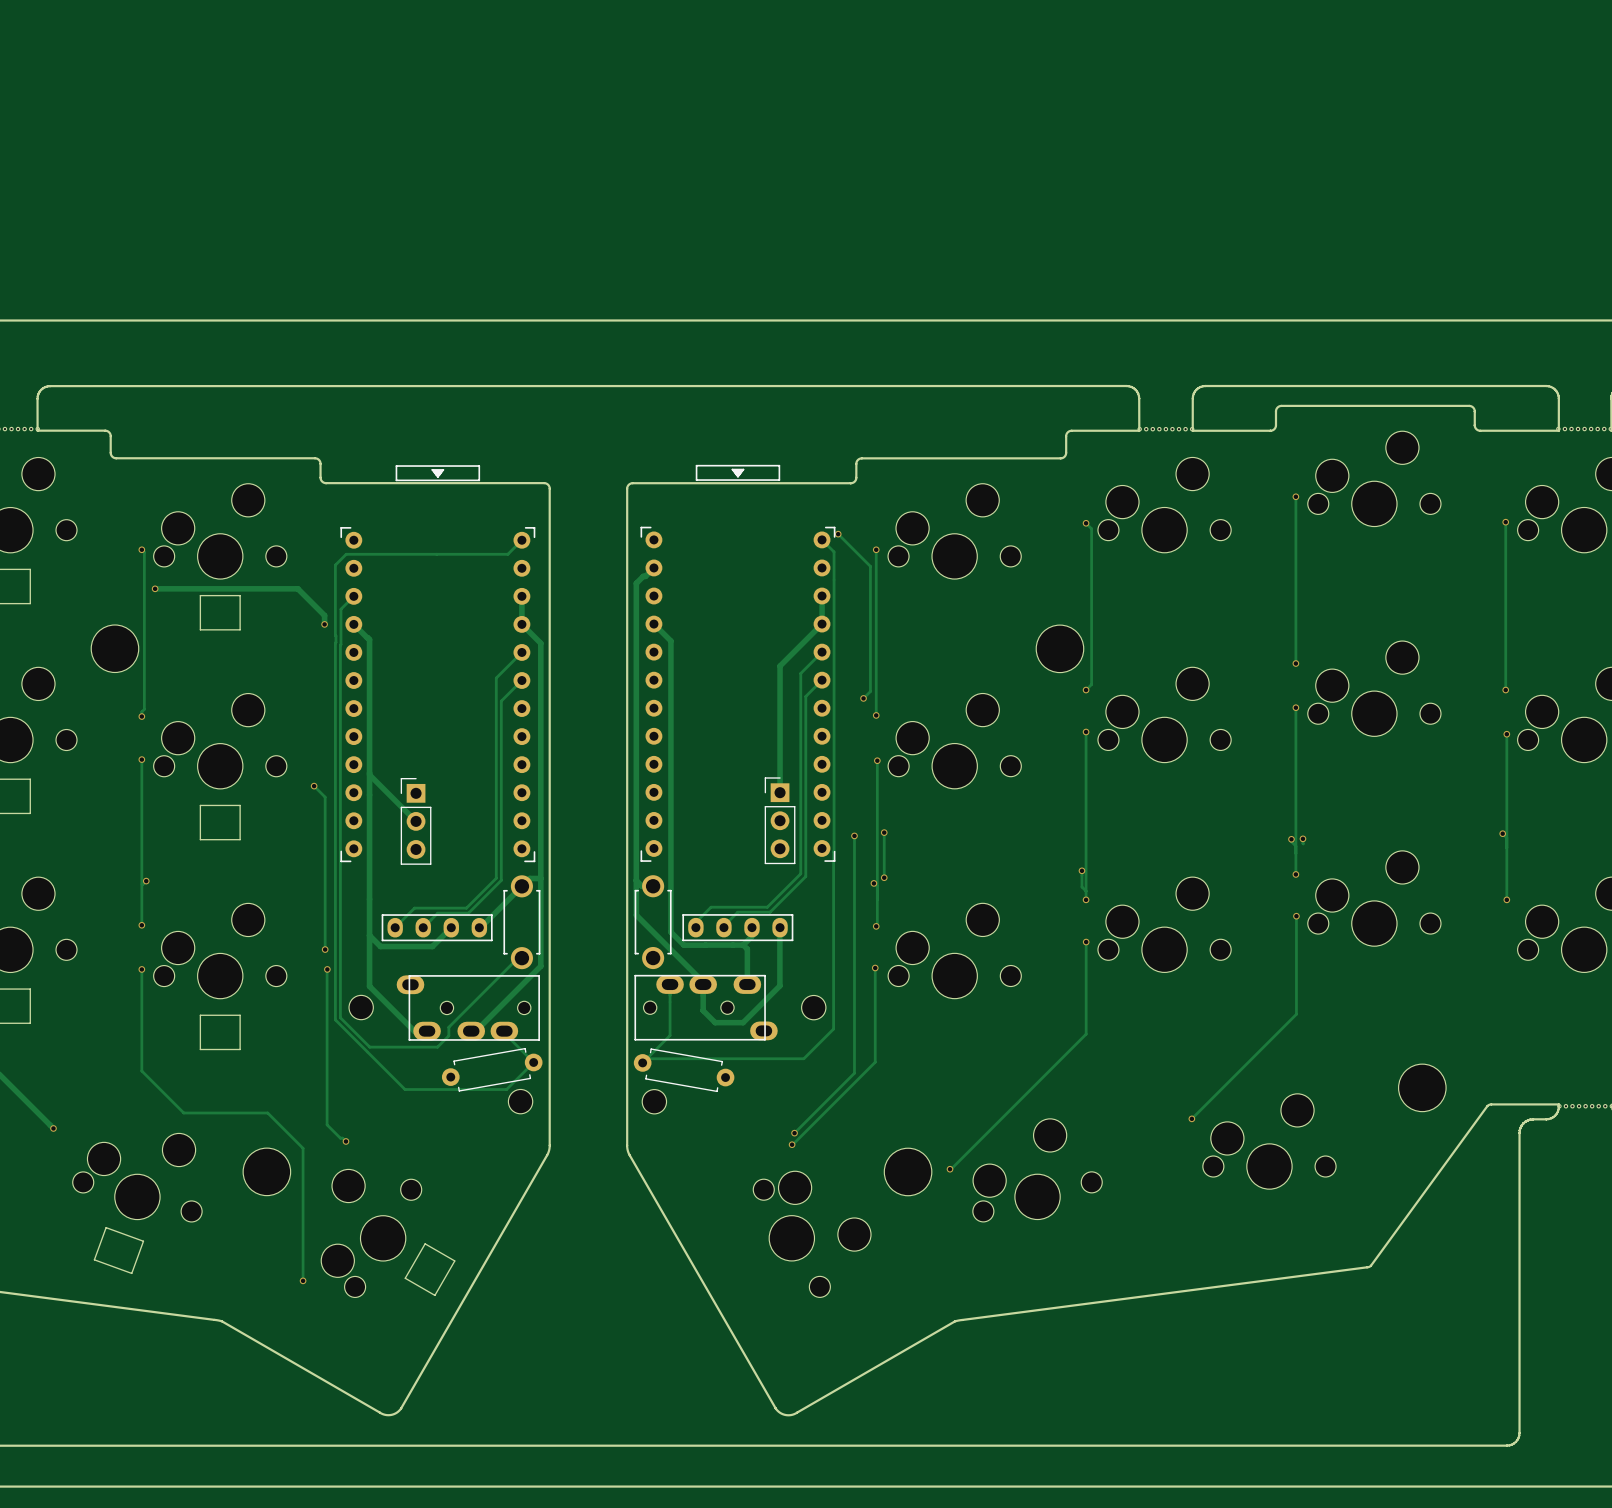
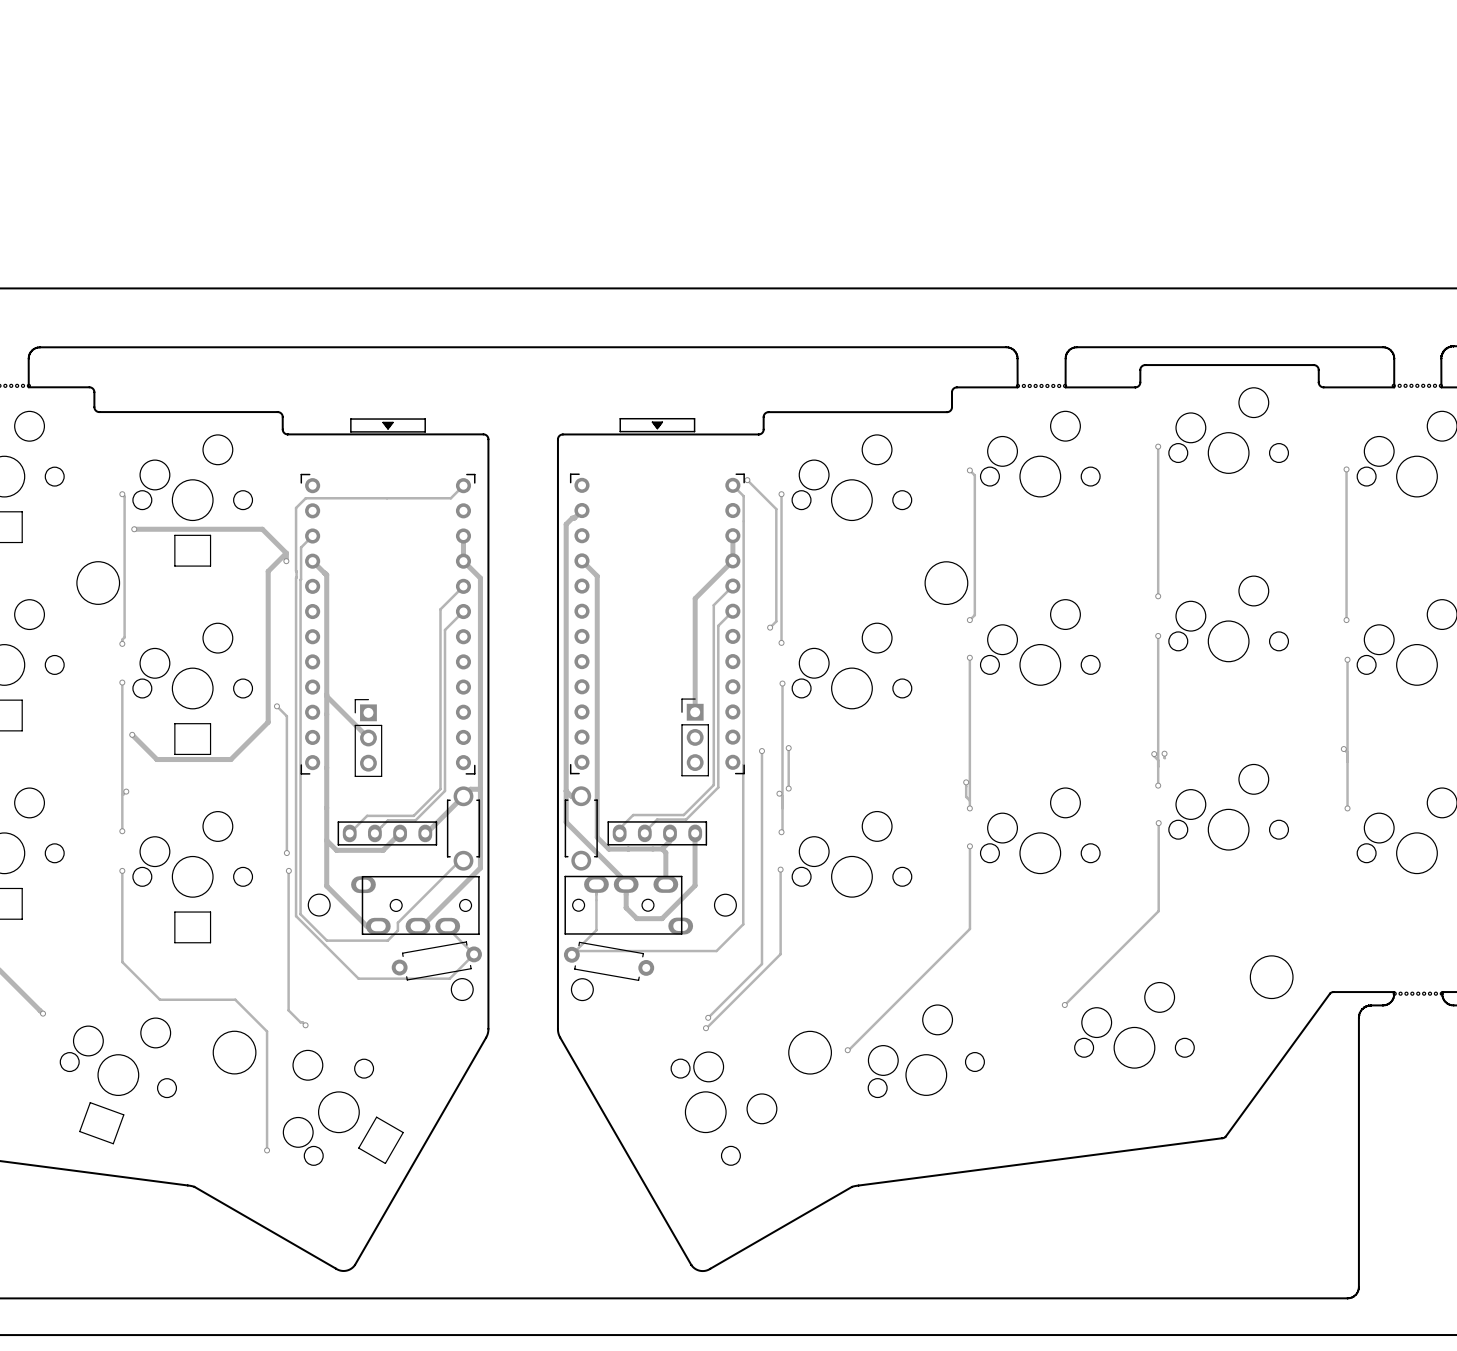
track: none -> (286, 553) (268, 571) (268, 722) (230, 759) (156, 759) (132, 734)
via: none -> (132, 734)

